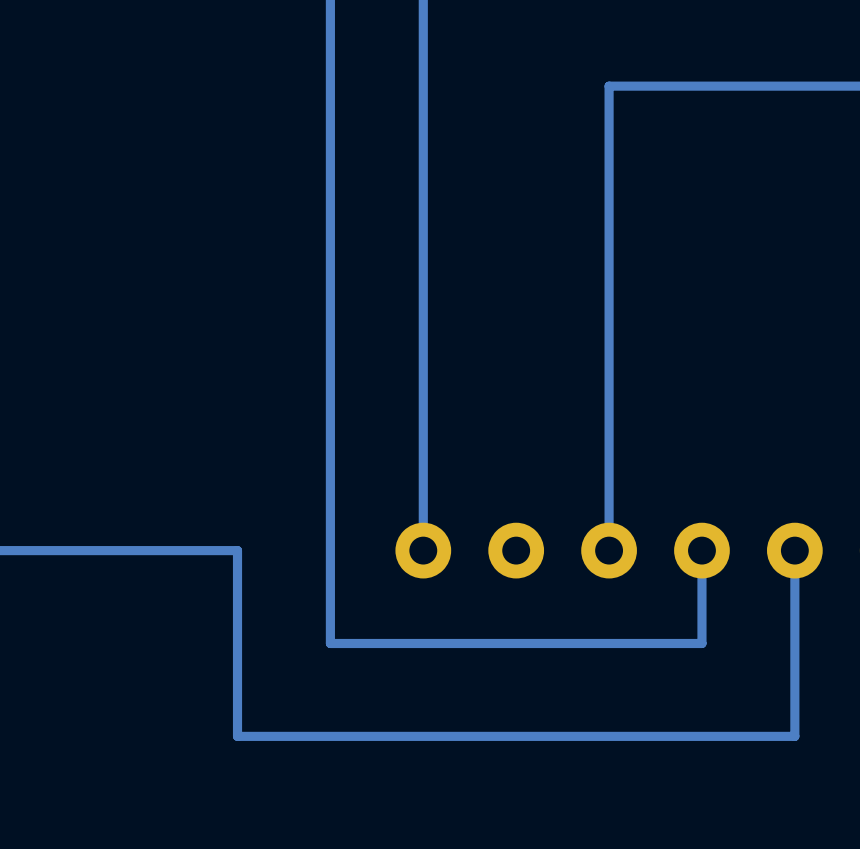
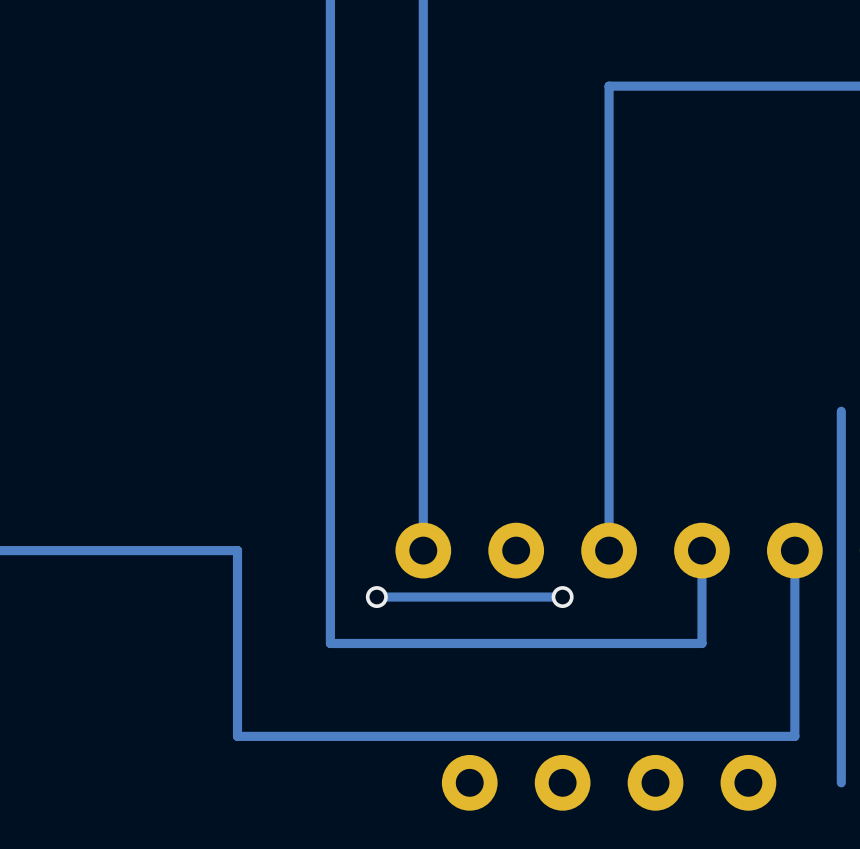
track: none -> (841, 411) (841, 782)
via: none -> (376, 597)
track: none -> (562, 597) (376, 597)
via: none -> (562, 597)
part: none -> (609, 782)

